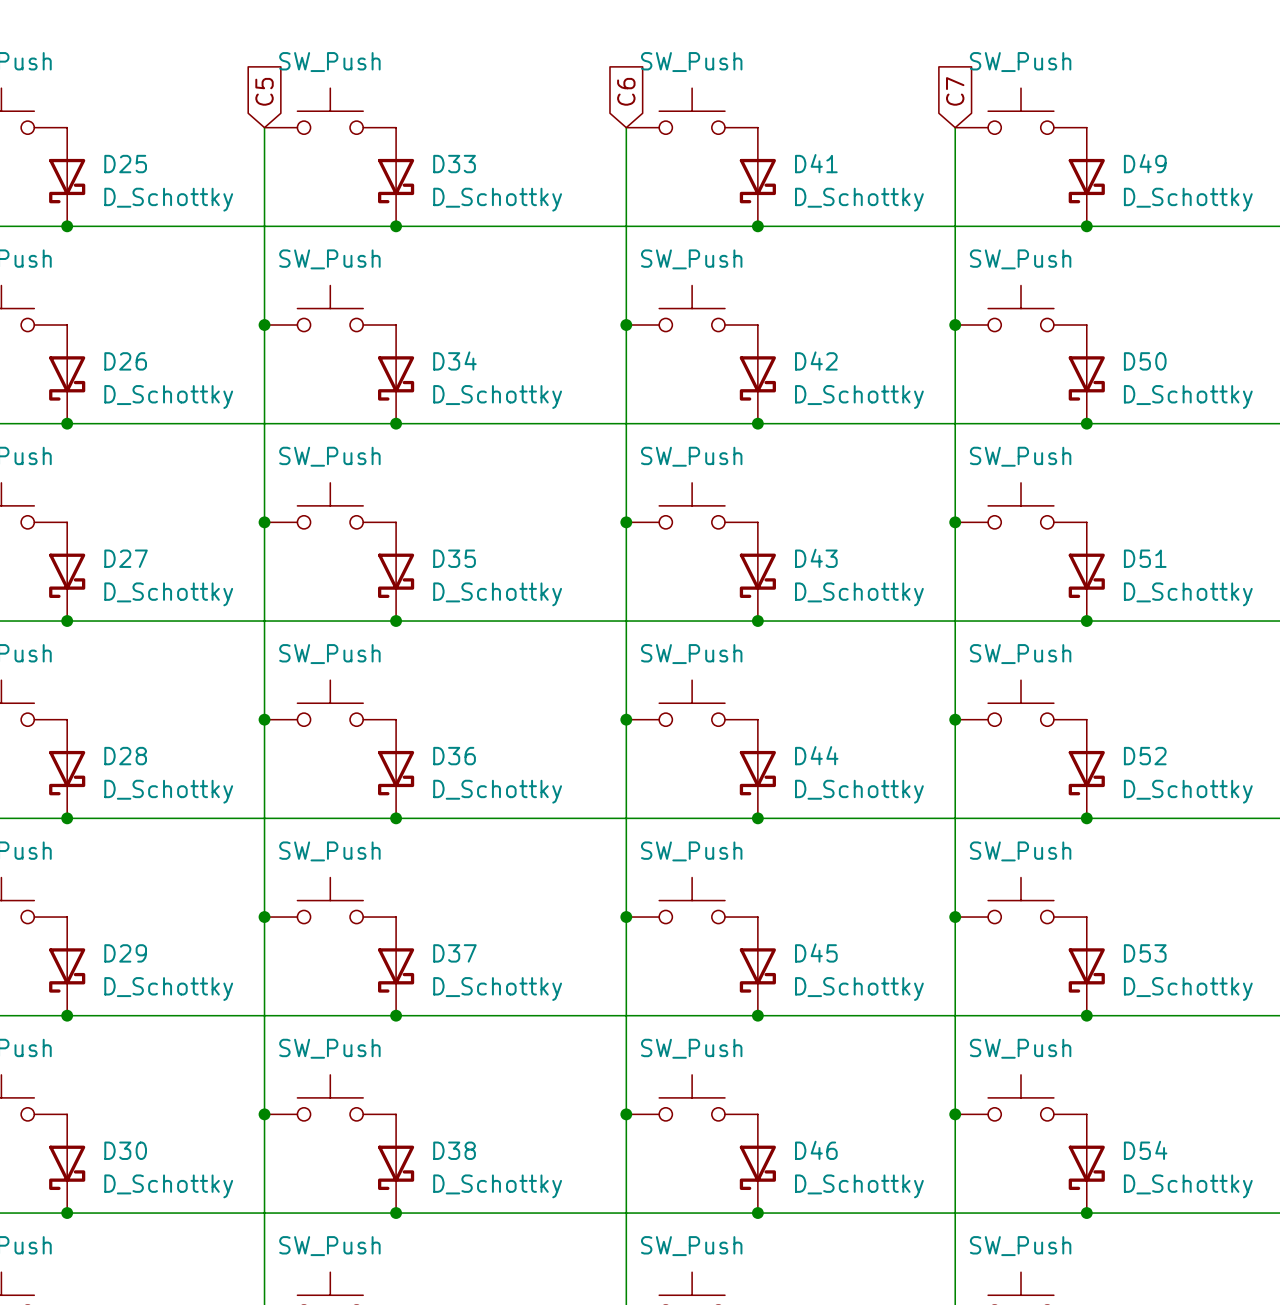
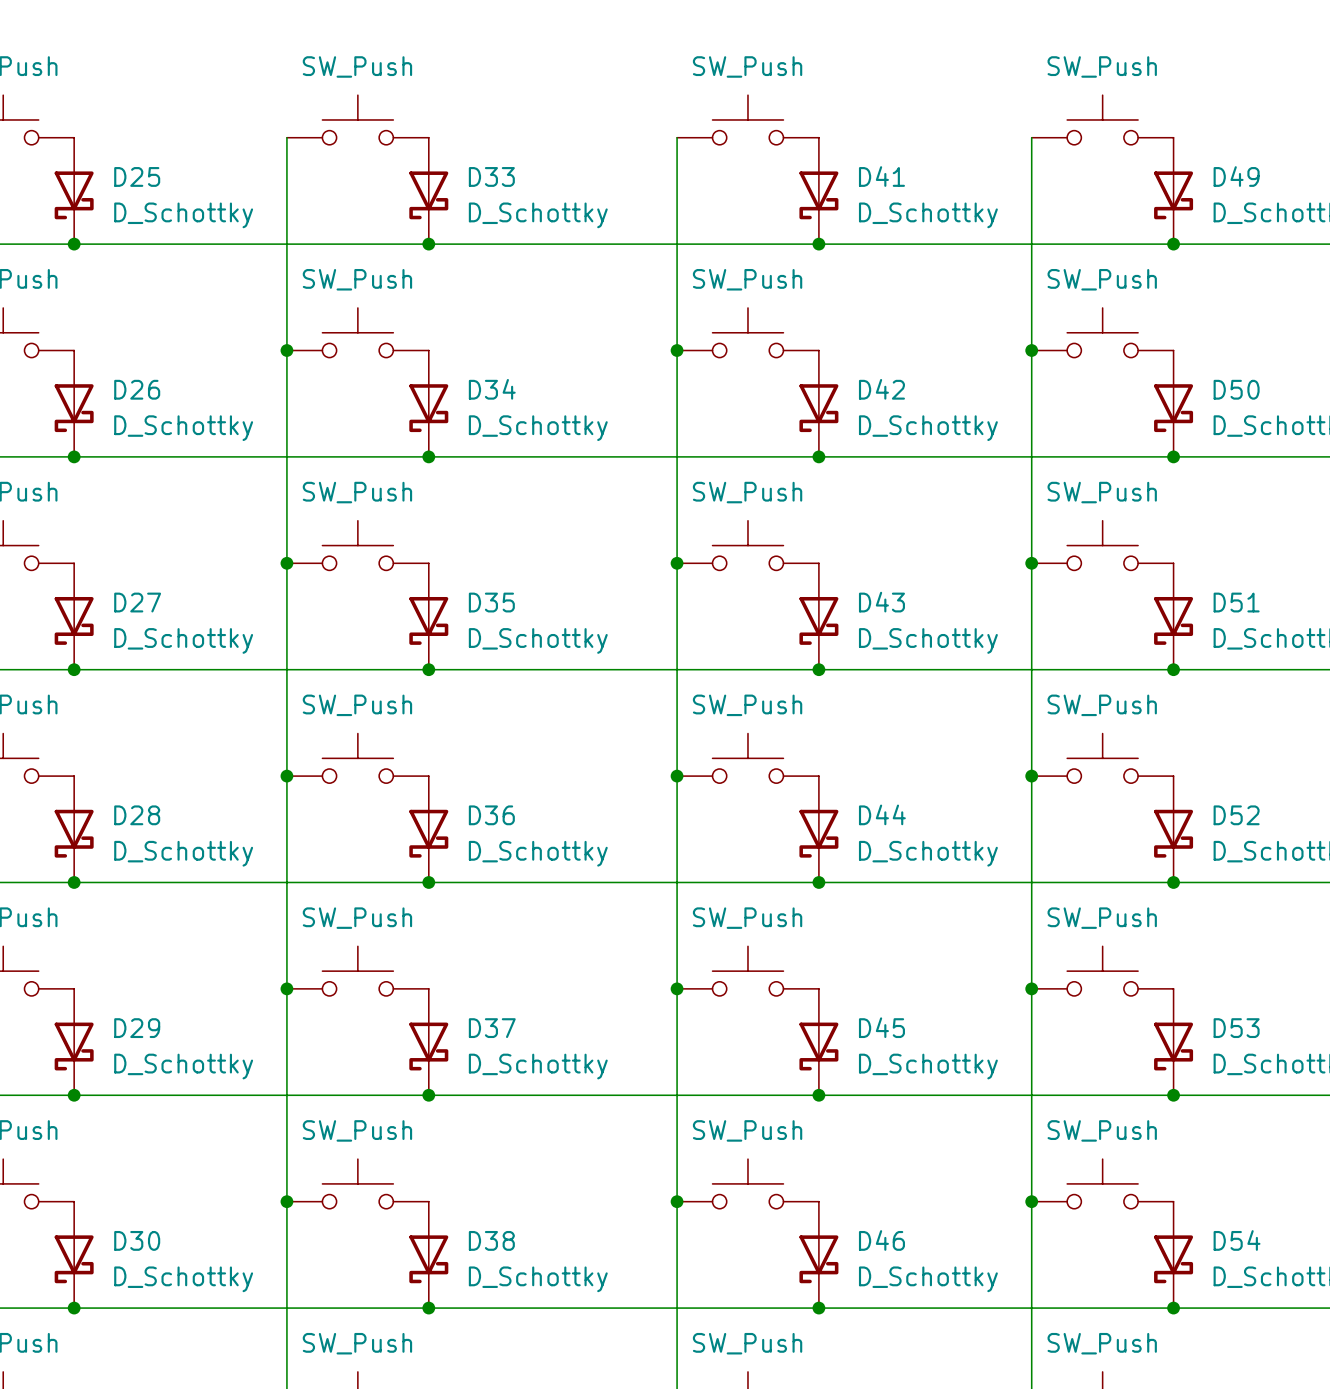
global label: C5 (264, 91) -> none
global label: C6 (626, 91) -> none
global label: C7 (955, 91) -> none

